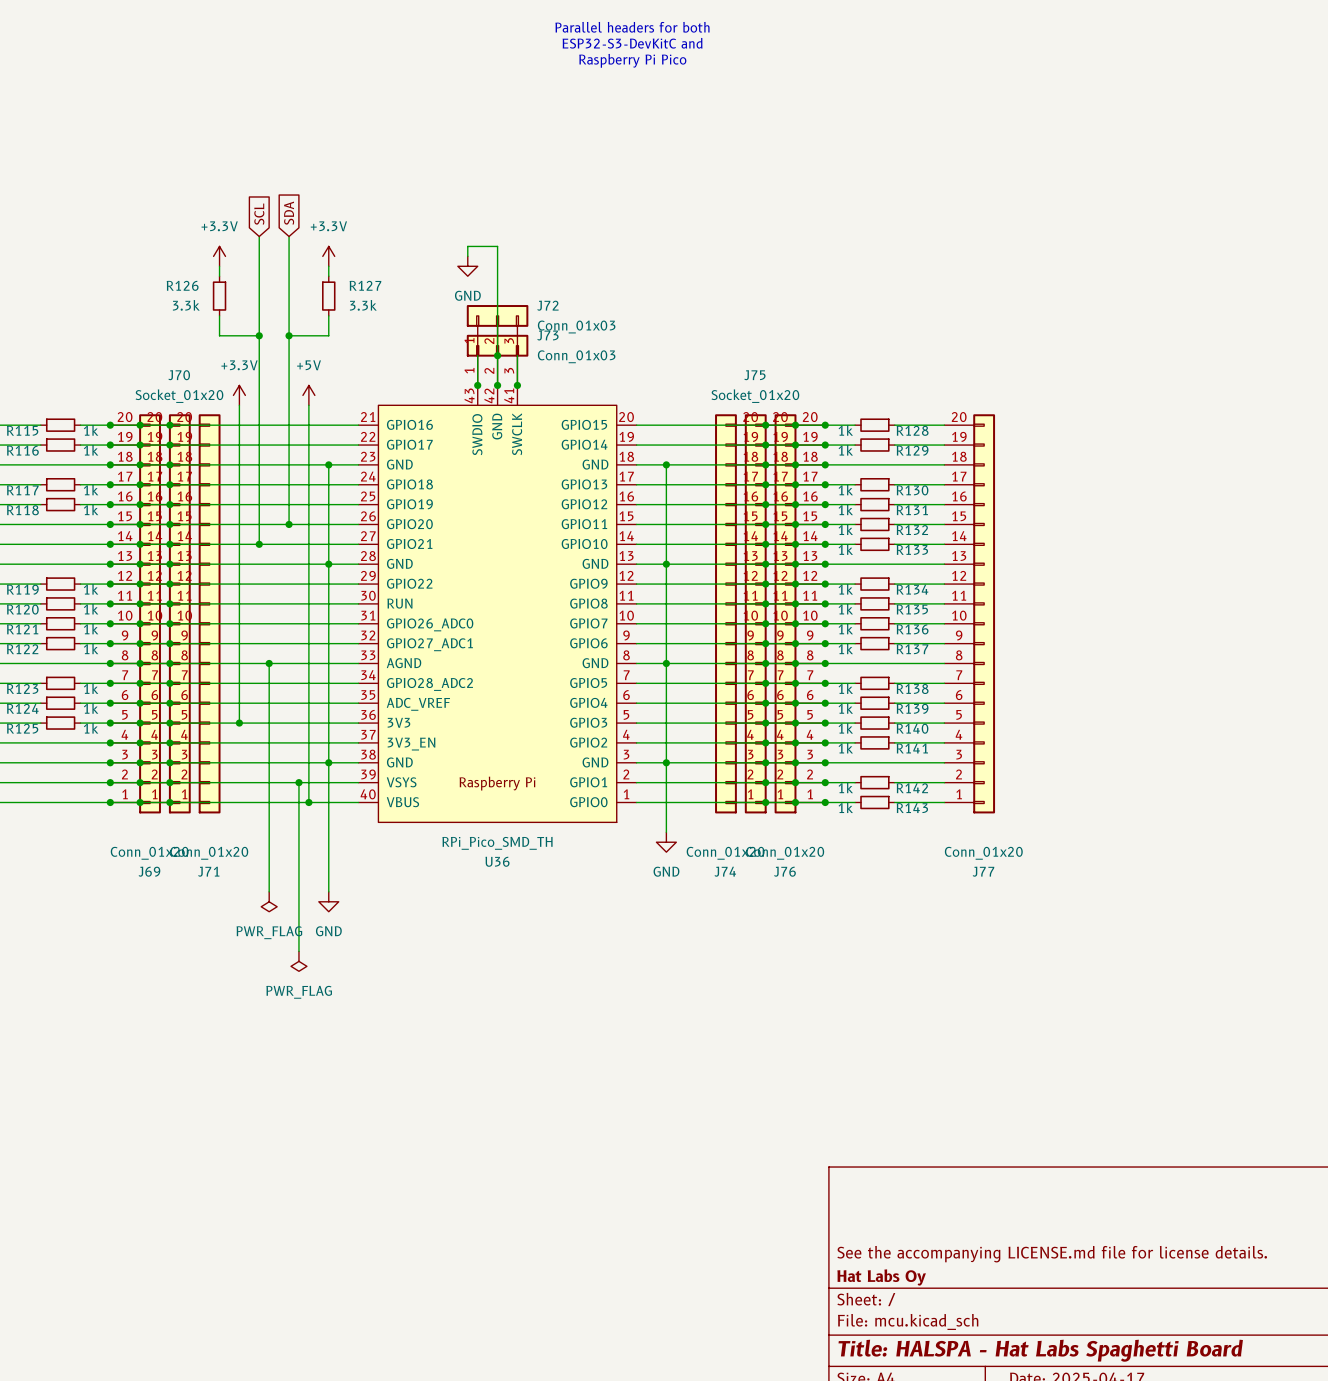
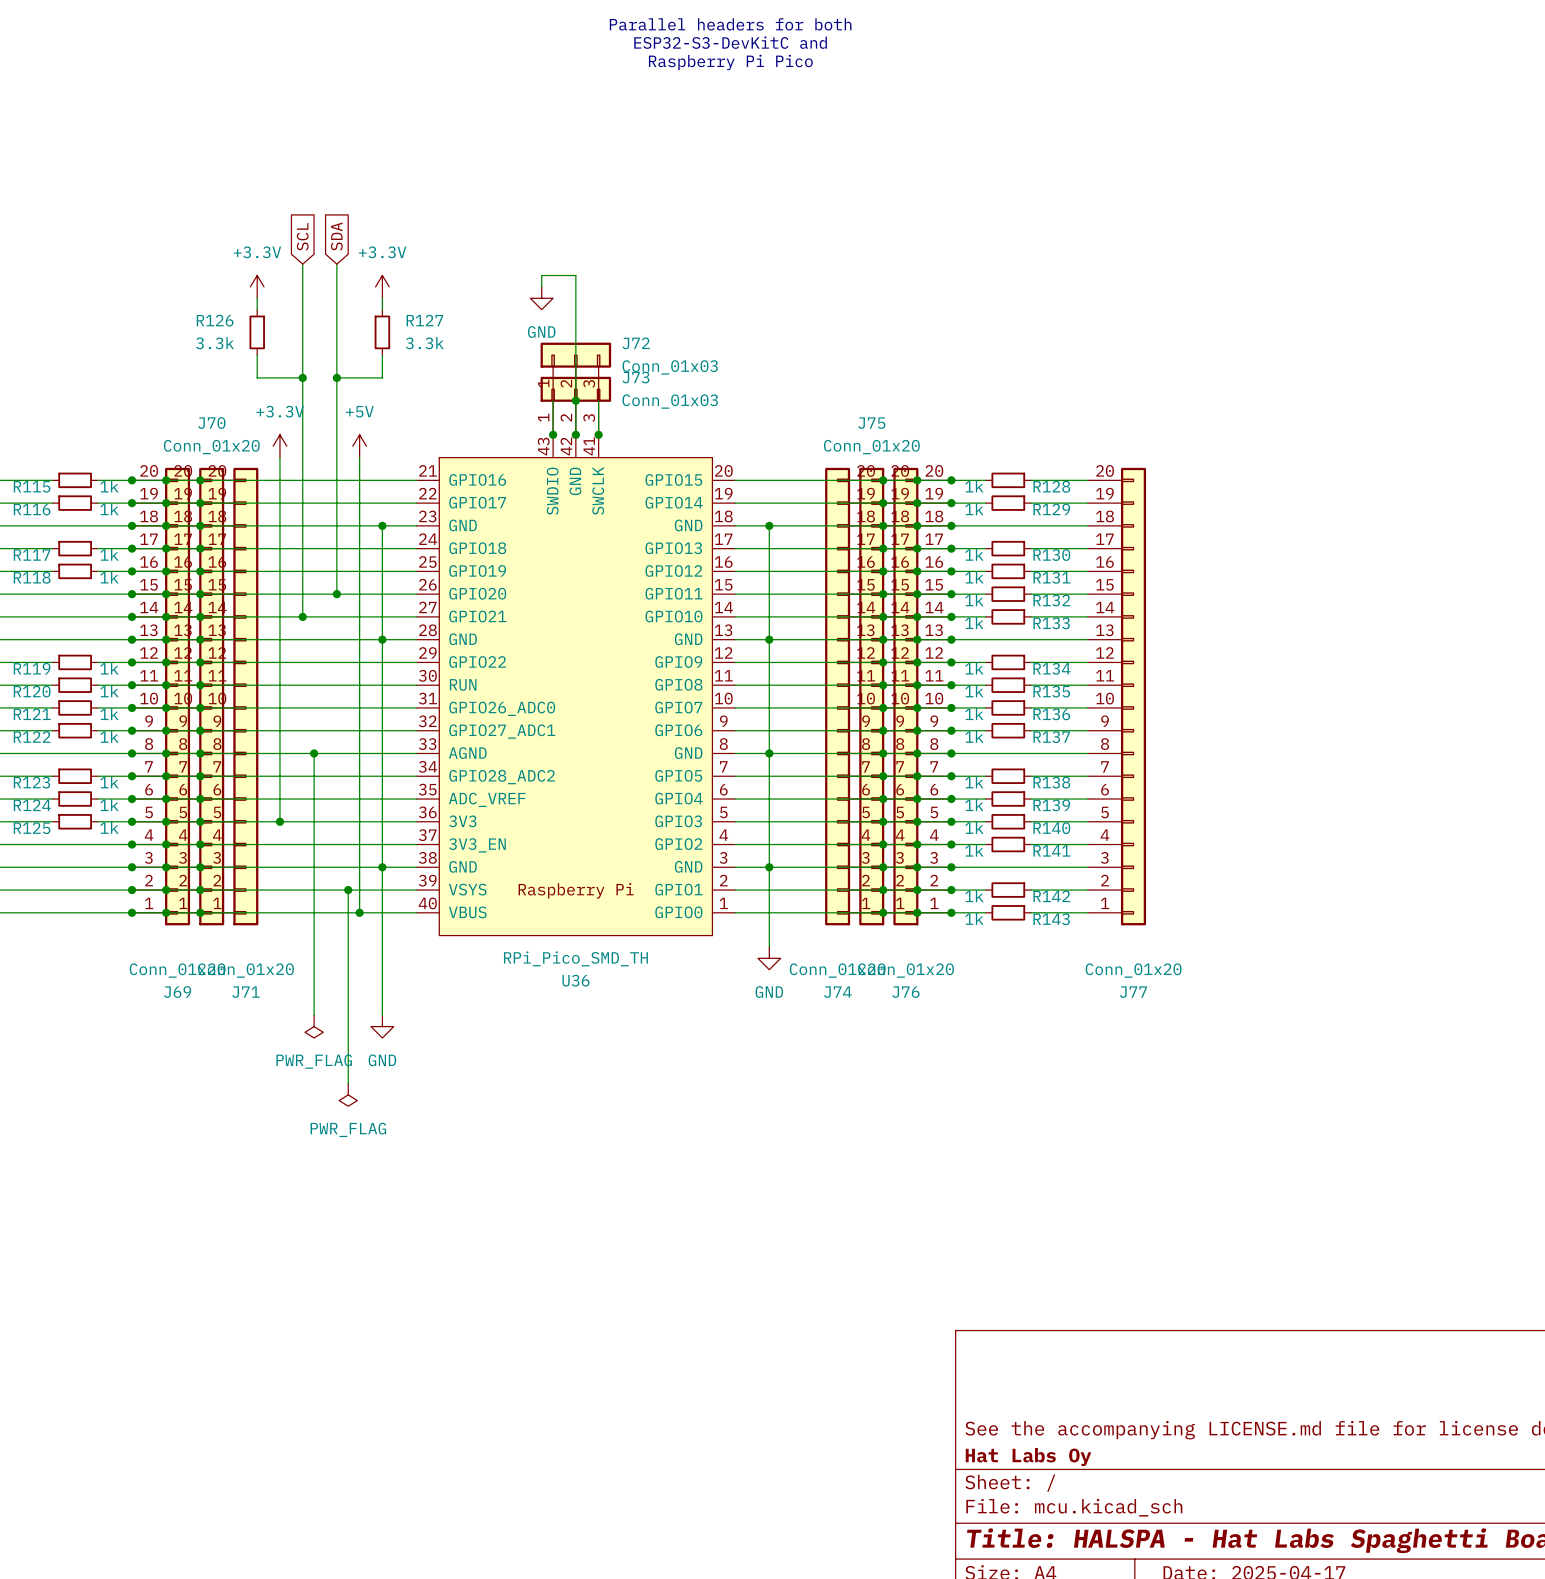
J70 value: Socket_01x20 (179, 396) -> Conn_01x20 (211, 447)
J75 value: Socket_01x20 (755, 396) -> Conn_01x20 (871, 447)

